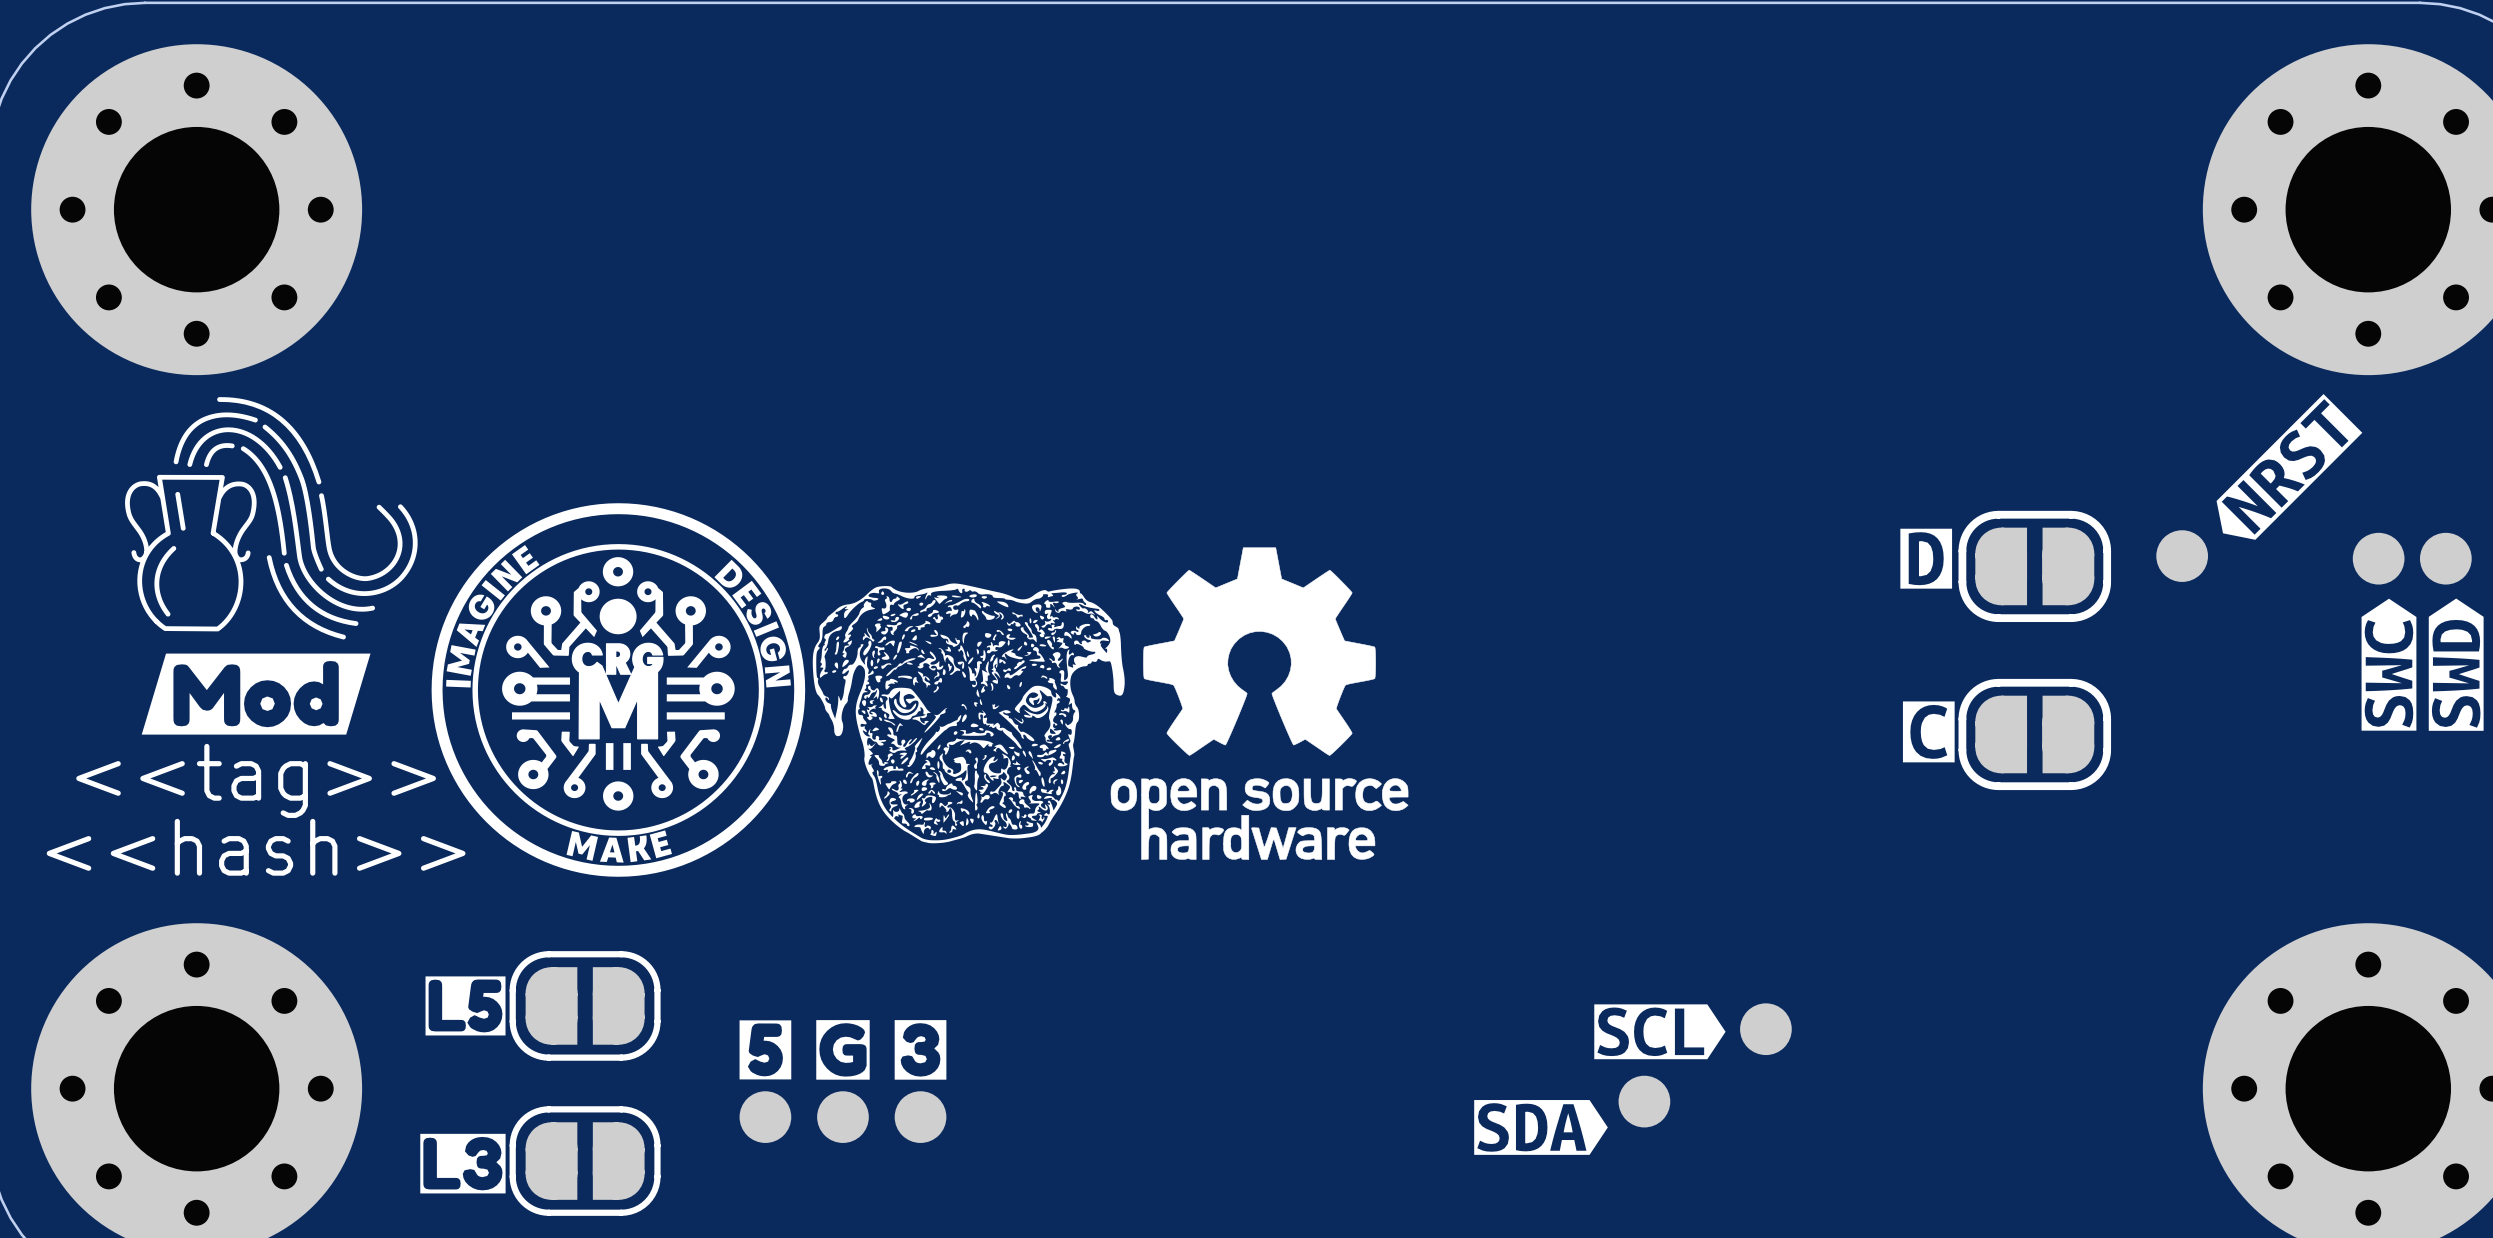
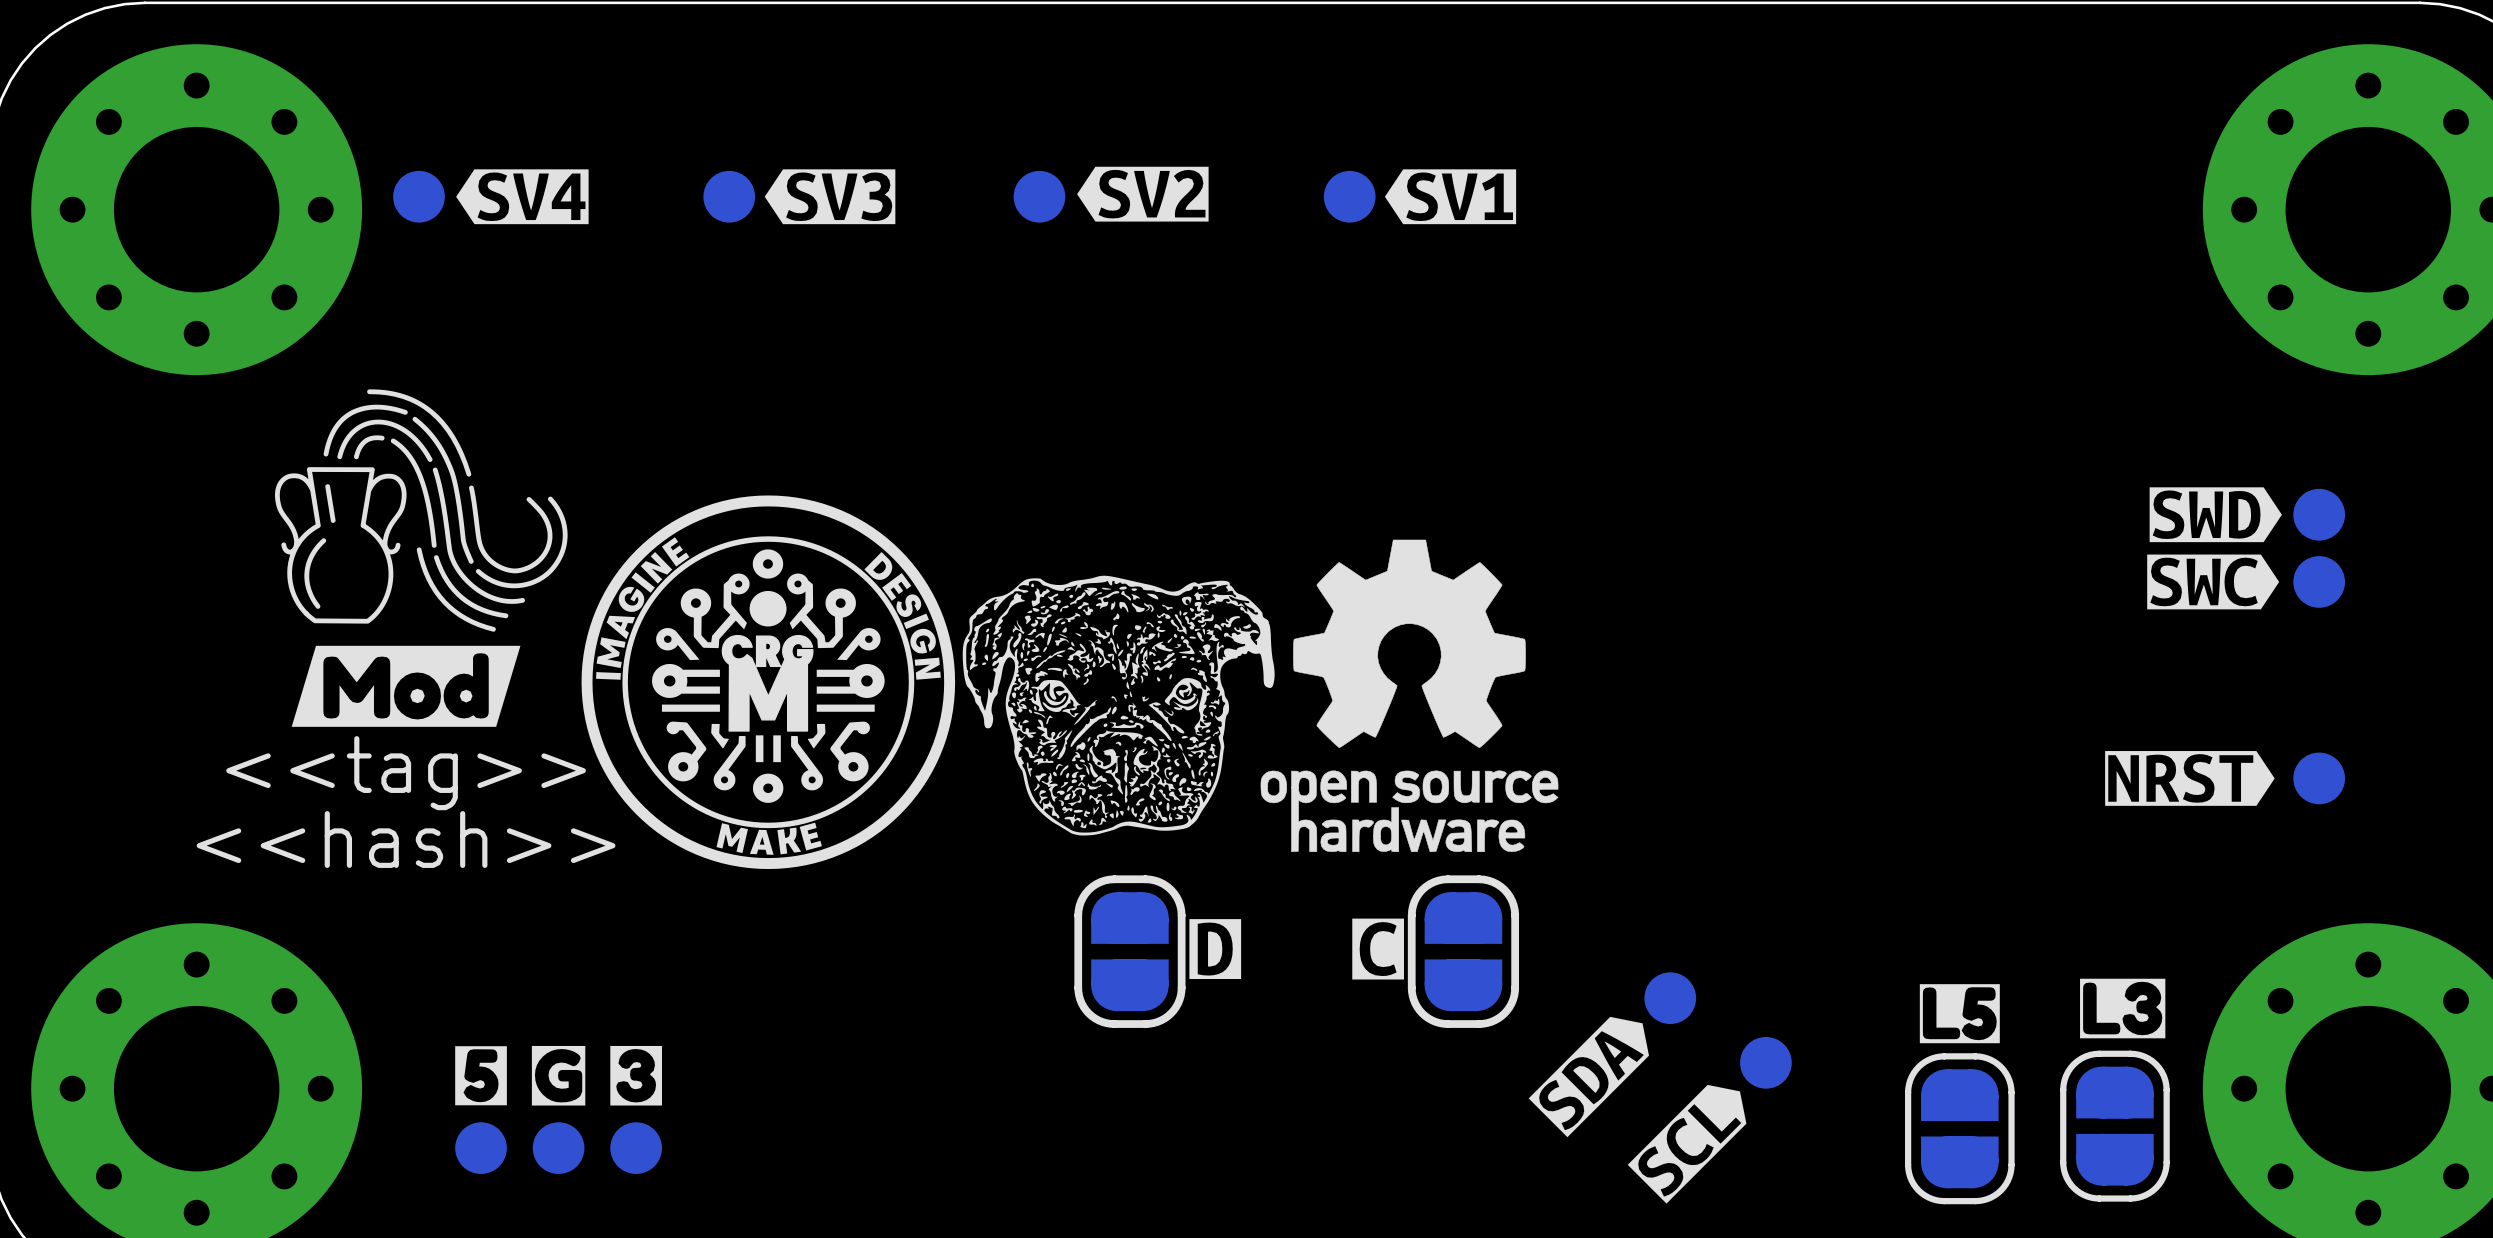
drawing: none -> [1077, 166, 1209, 222]
drawing: none -> [456, 169, 589, 225]
drawing: none -> [764, 169, 896, 225]
drawing: none -> [1384, 169, 1517, 225]
part: none -> (418, 196)
part: none -> (729, 196)
part: none -> (1039, 196)
part: none -> (1349, 196)
drawing: [2216, 394, 2484, 731] -> none
drawing: none -> [2147, 487, 2282, 610]
part: none -> (2319, 514)
drawing position: (271, 518) -> (421, 510)
part: (2182, 556) -> none
drawing position: (1926, 558) -> (1215, 949)
part: (2378, 558) -> none
part: (2445, 558) -> none
part: (2034, 566) -> none
part: none -> (2319, 581)
drawing position: (618, 689) -> (768, 682)
drawing position: (256, 694) -> (406, 686)
drawing position: (1259, 703) -> (1409, 695)
drawing position: (968, 713) -> (1118, 705)
drawing position: (1928, 731) -> (1378, 949)
part: (2034, 734) -> none
drawing: none -> [2105, 751, 2275, 806]
part: none -> (2319, 778)
text position: <<tag>> (256, 780) -> <<tag>> (406, 773)
text position: <<hash>> (256, 847) -> <<hash>> (406, 839)
part: none -> (1129, 951)
part: none -> (1463, 951)
drawing: [425, 976, 506, 1036] -> none
drawing: none -> [2080, 978, 2166, 1039]
drawing: none -> [1919, 984, 2000, 1044]
drawing: [1474, 1004, 1726, 1155] -> none
part: (585, 1005) -> none
drawing: none -> [1528, 1016, 1747, 1204]
part position: (1765, 1029) -> (1765, 1062)
drawing position: (765, 1049) -> (481, 1075)
drawing position: (842, 1049) -> (558, 1075)
drawing position: (920, 1049) -> (636, 1075)
part position: (1644, 1101) -> (1670, 998)
part: (765, 1117) -> none
part: (842, 1117) -> none
part: (920, 1117) -> none
part: none -> (2114, 1126)
part: none -> (1959, 1128)
drawing: [420, 1133, 506, 1194] -> none
part: none -> (481, 1148)
part: none -> (558, 1148)
part: none -> (636, 1148)
part: (585, 1161) -> none

